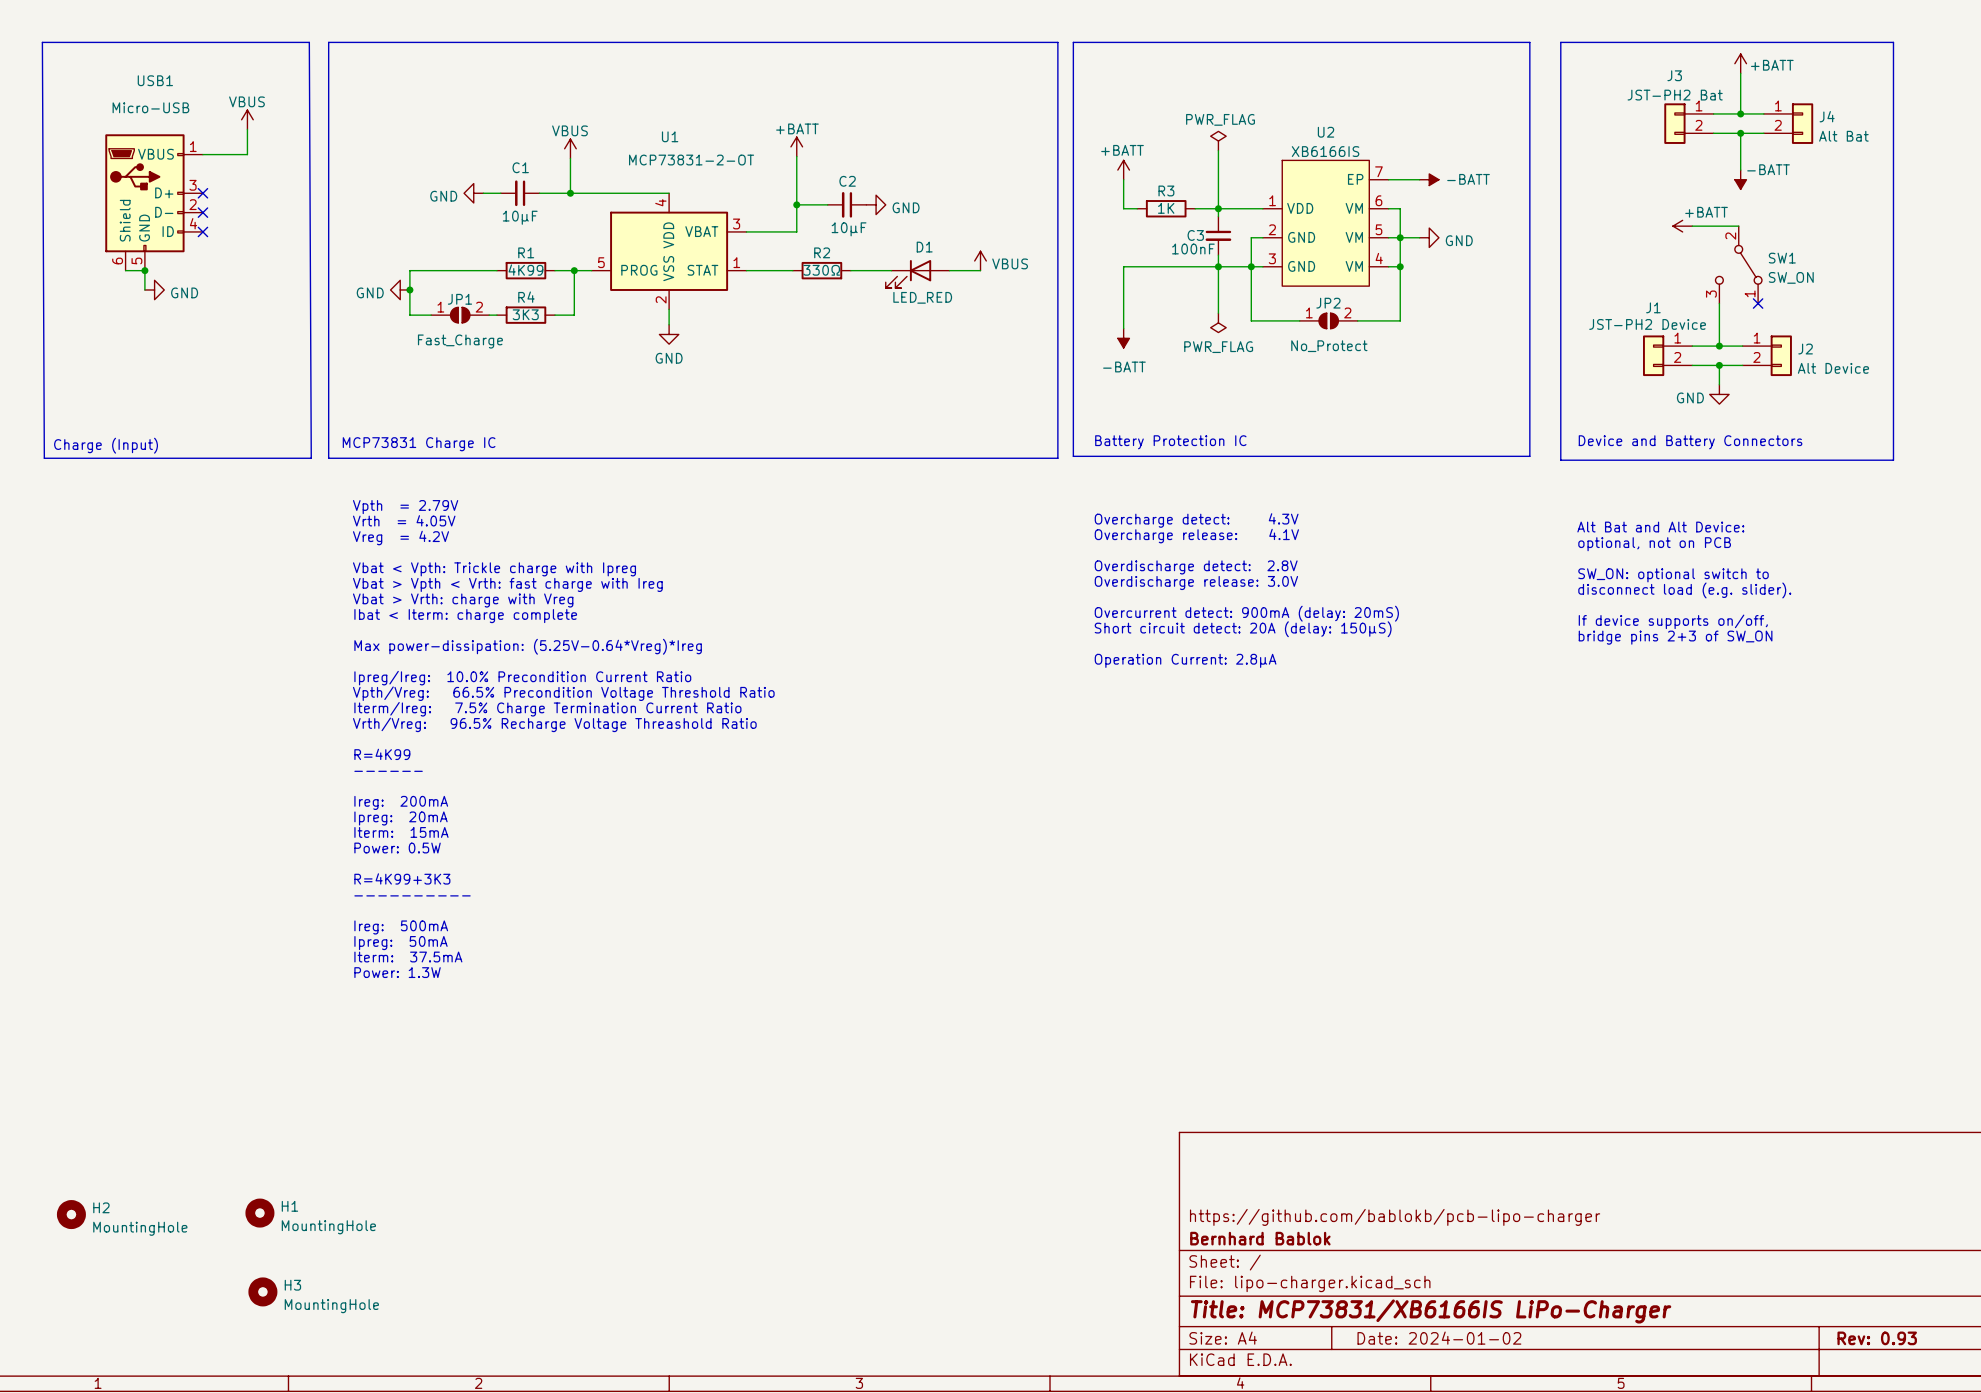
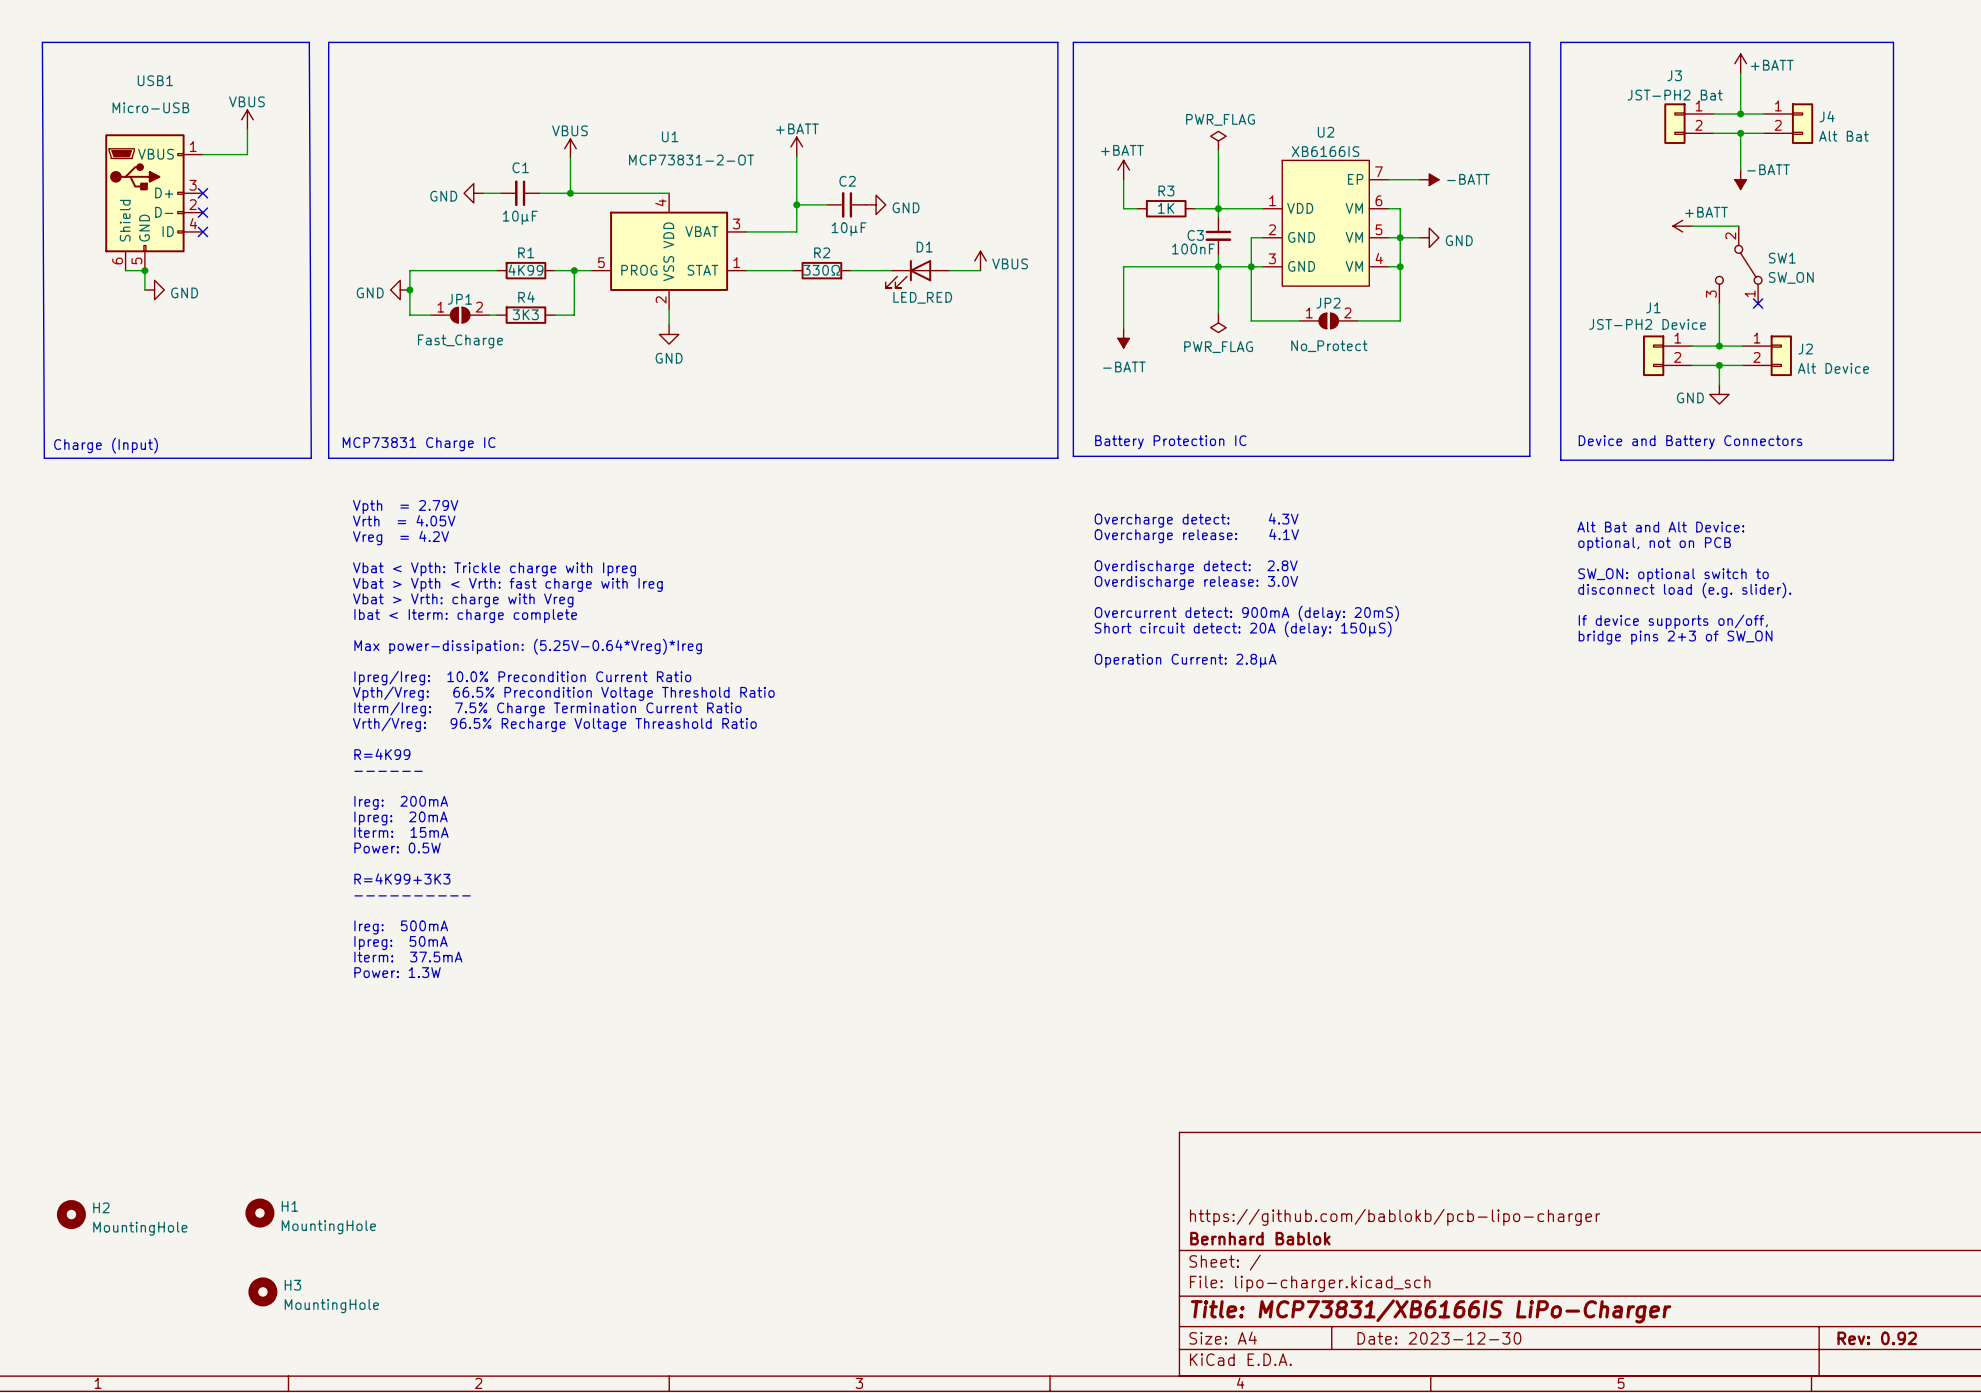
title block: Date: 2024-01-02 (1439, 1338) -> Date: 2023-12-30 (1439, 1338)
title block: Rev: 0.93 (1877, 1338) -> Rev: 0.92 (1877, 1338)

